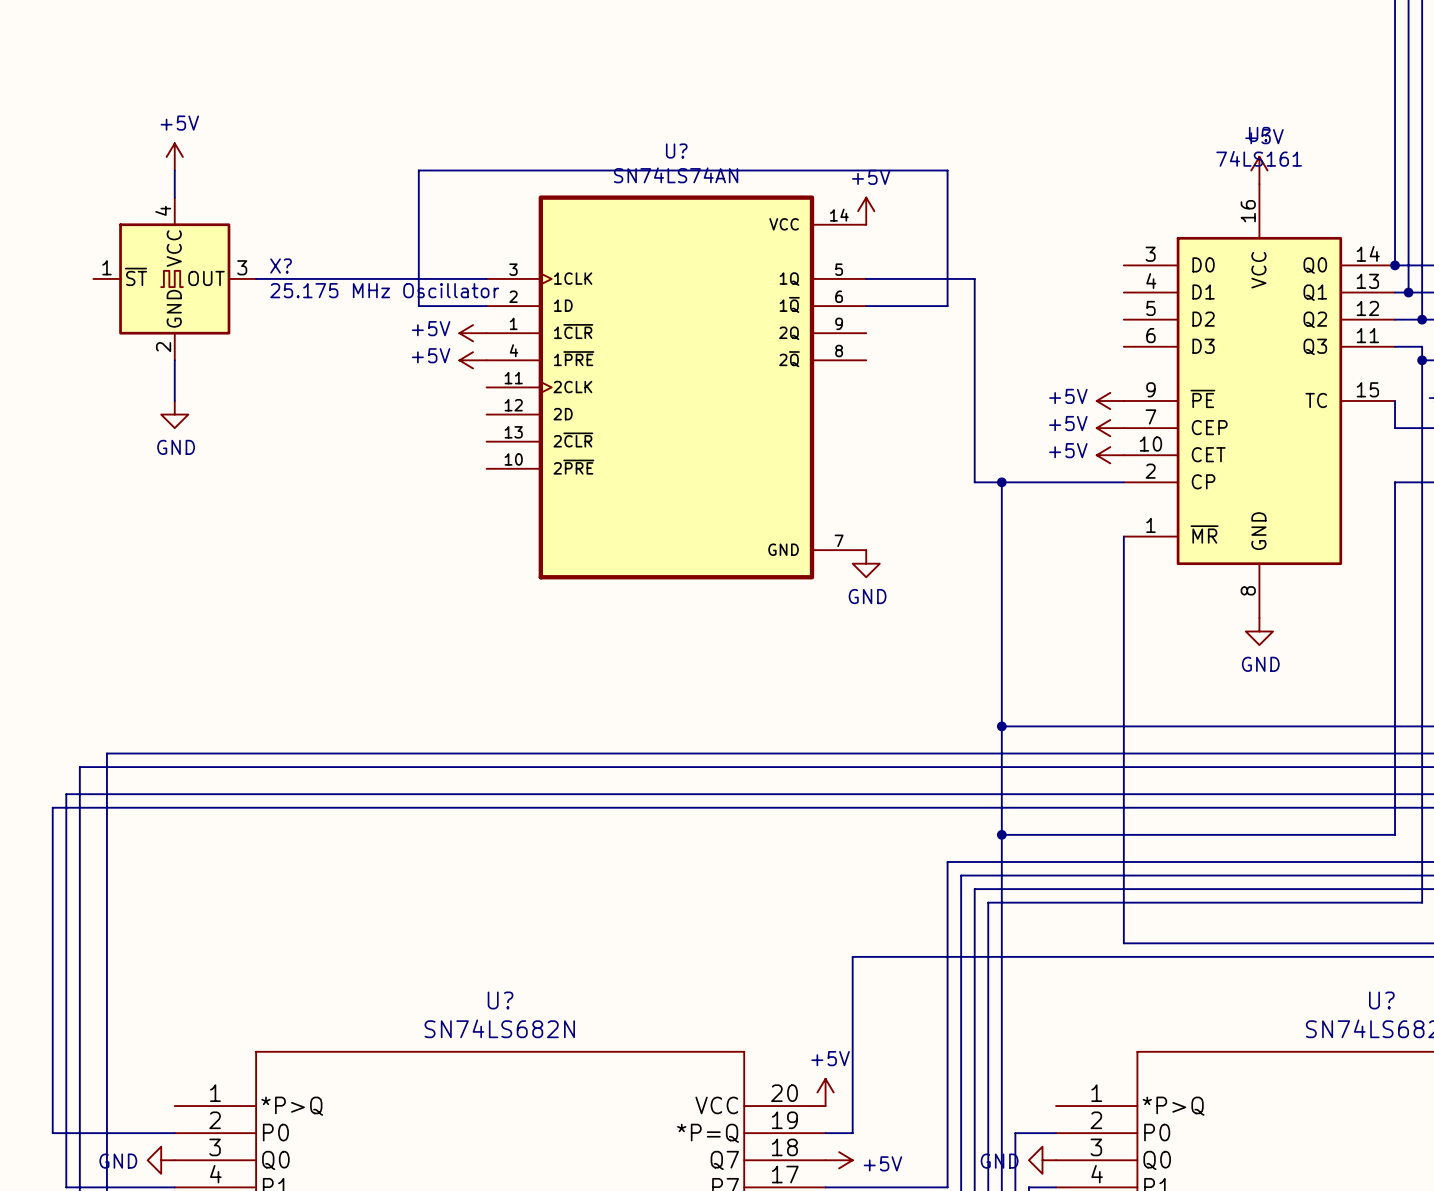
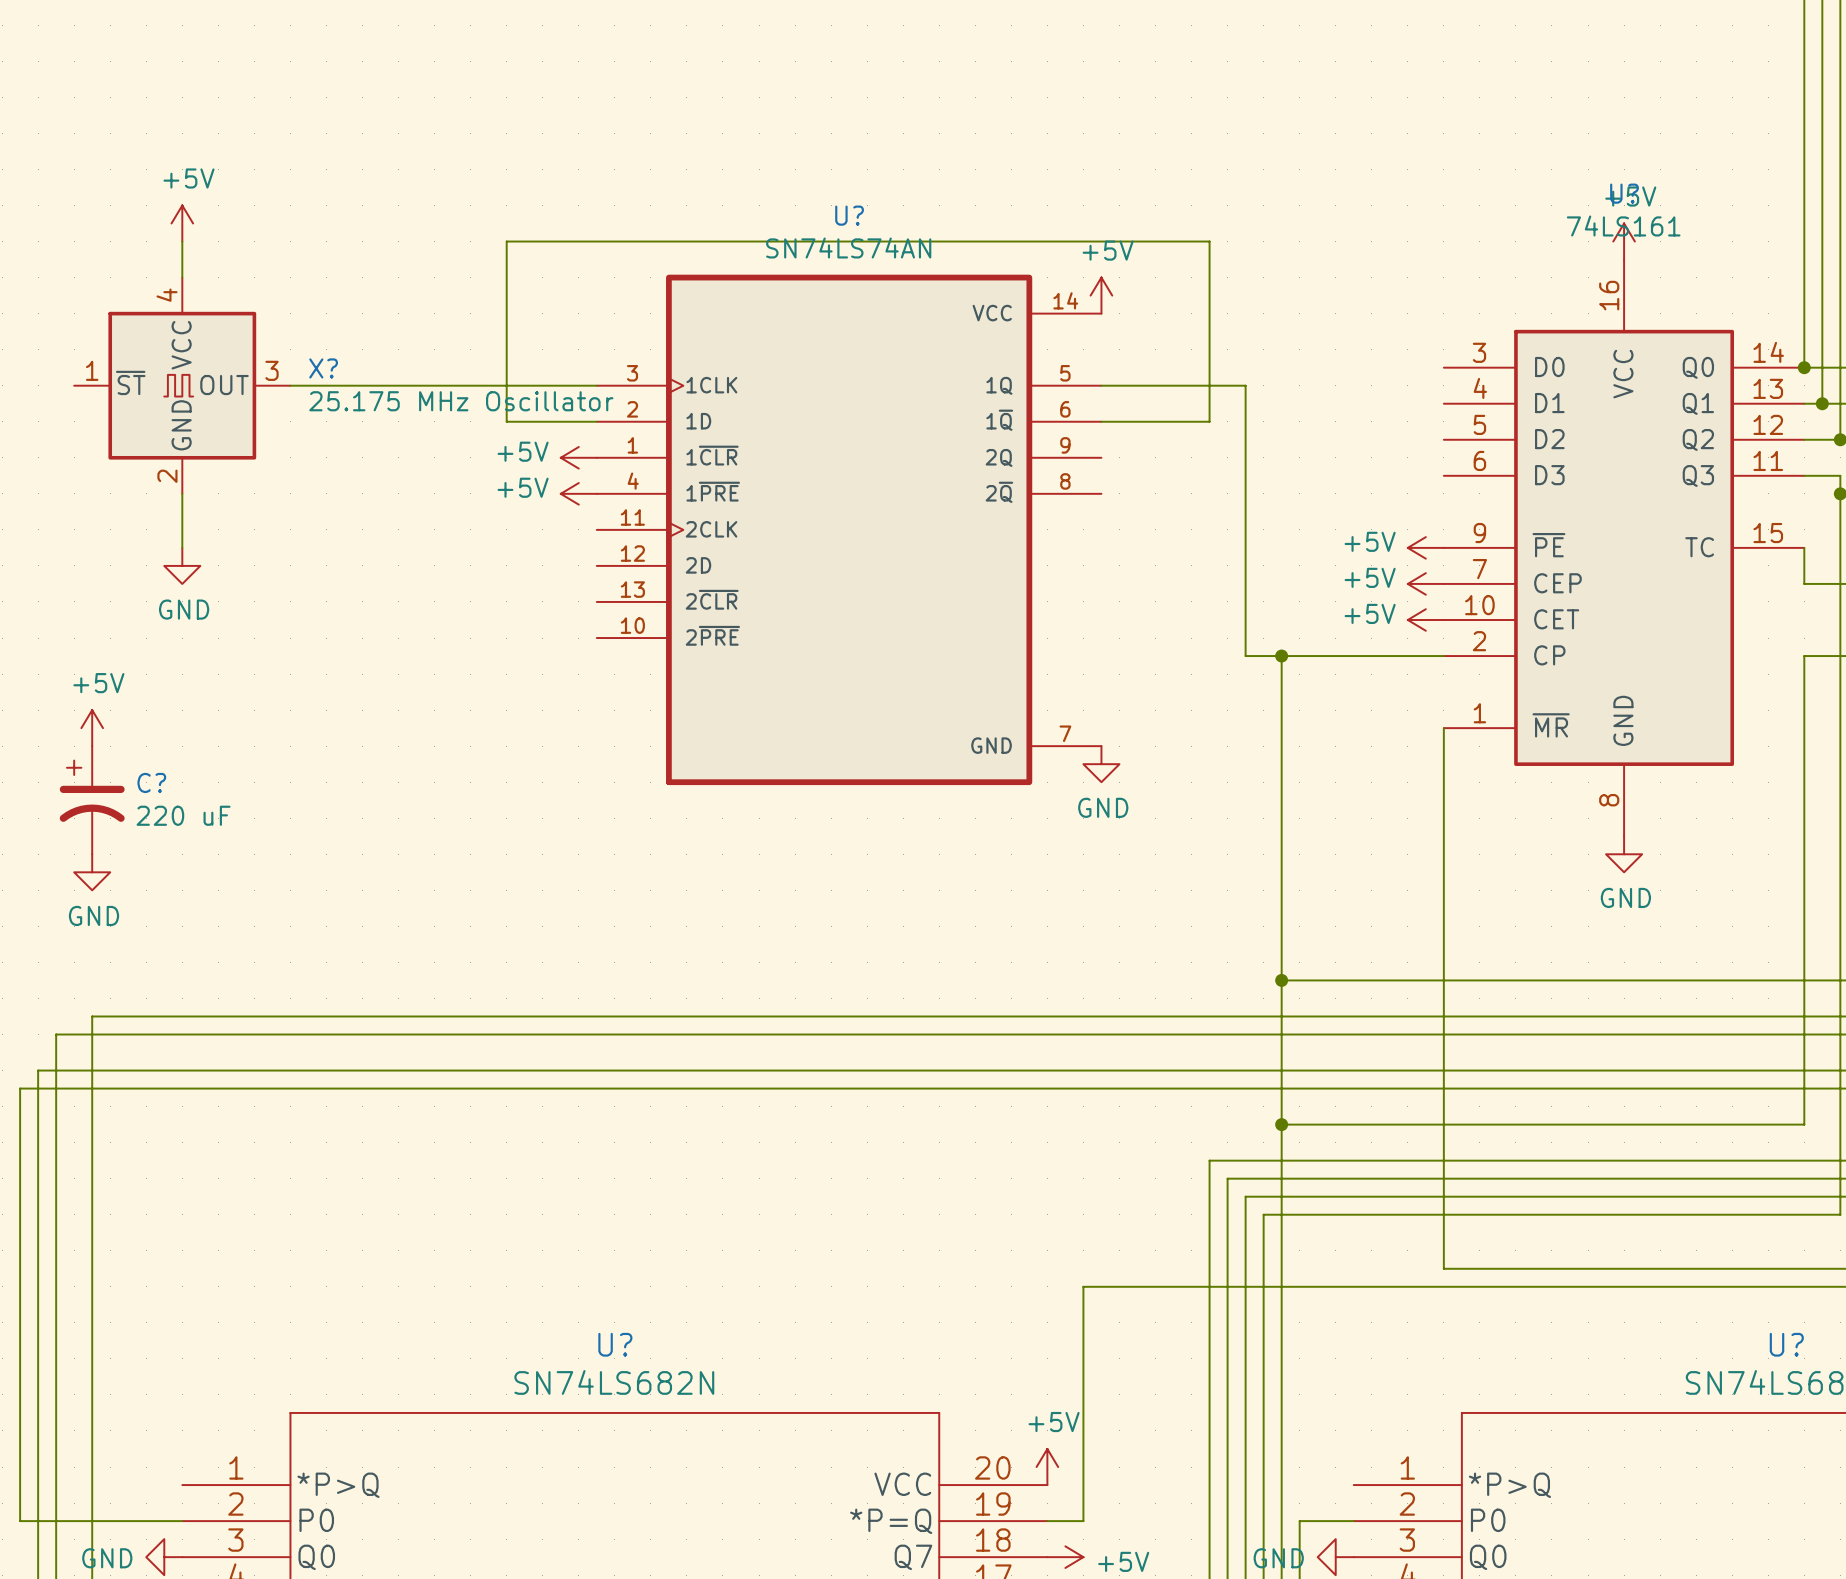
power symbol: none -> +5V (92, 728)
C?: none -> 220 uF (92, 800)
power symbol: none -> GND (92, 872)

